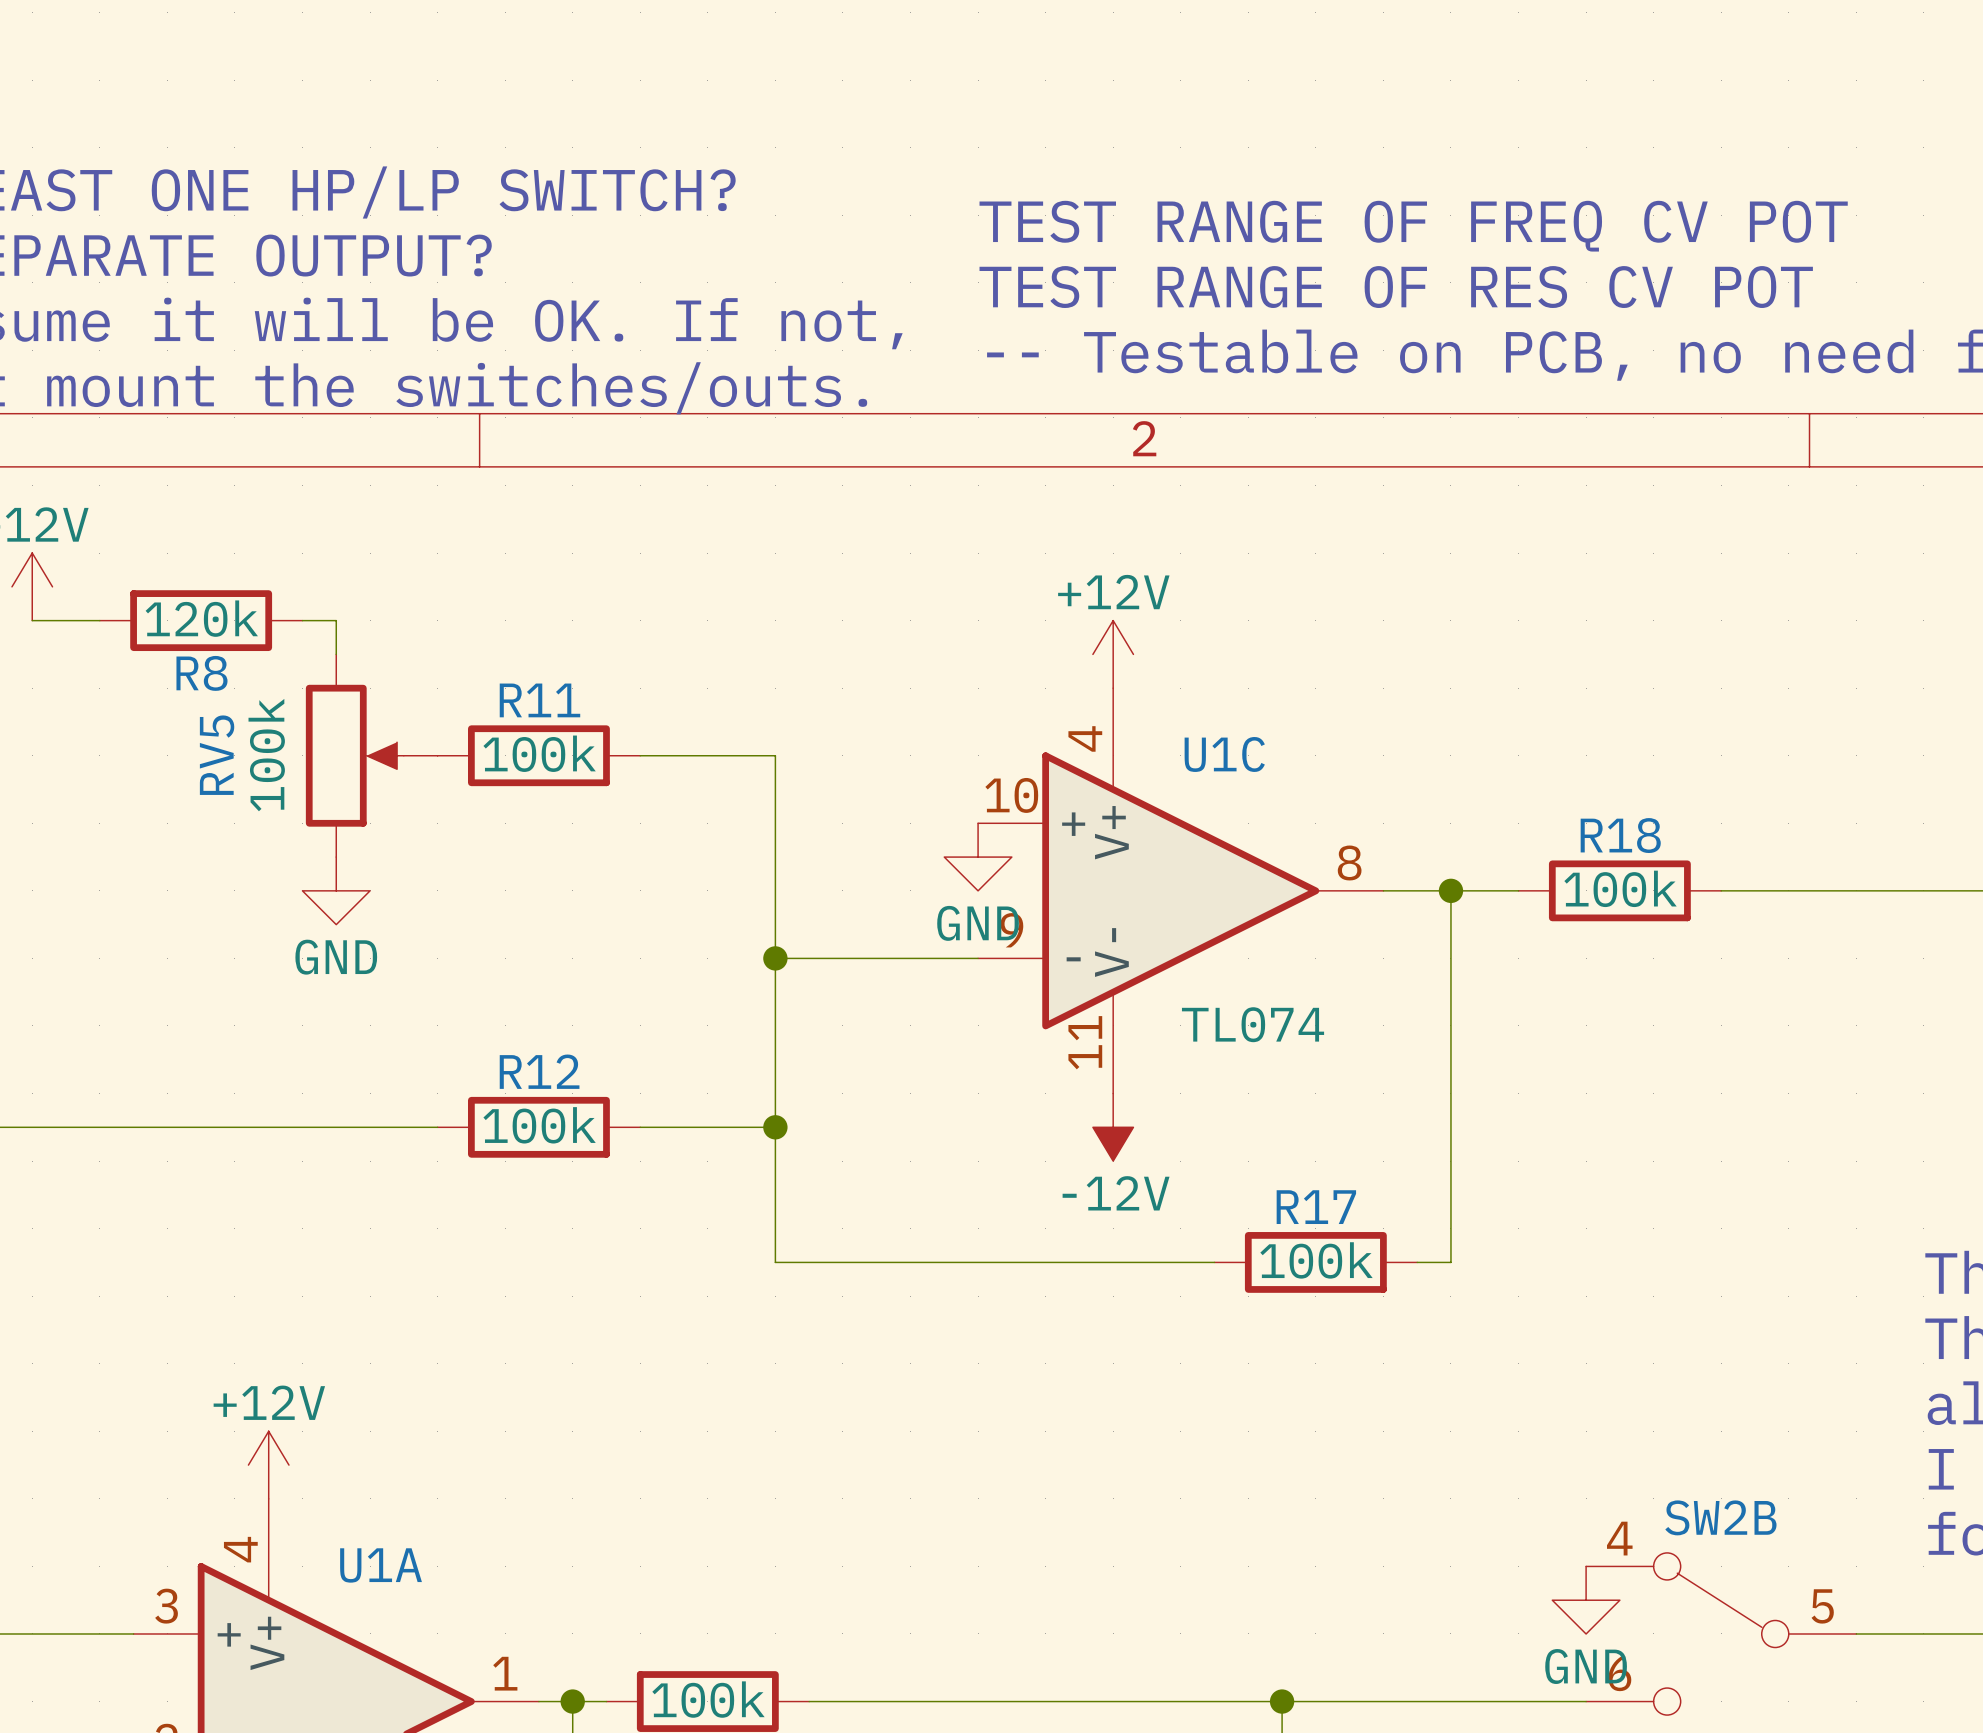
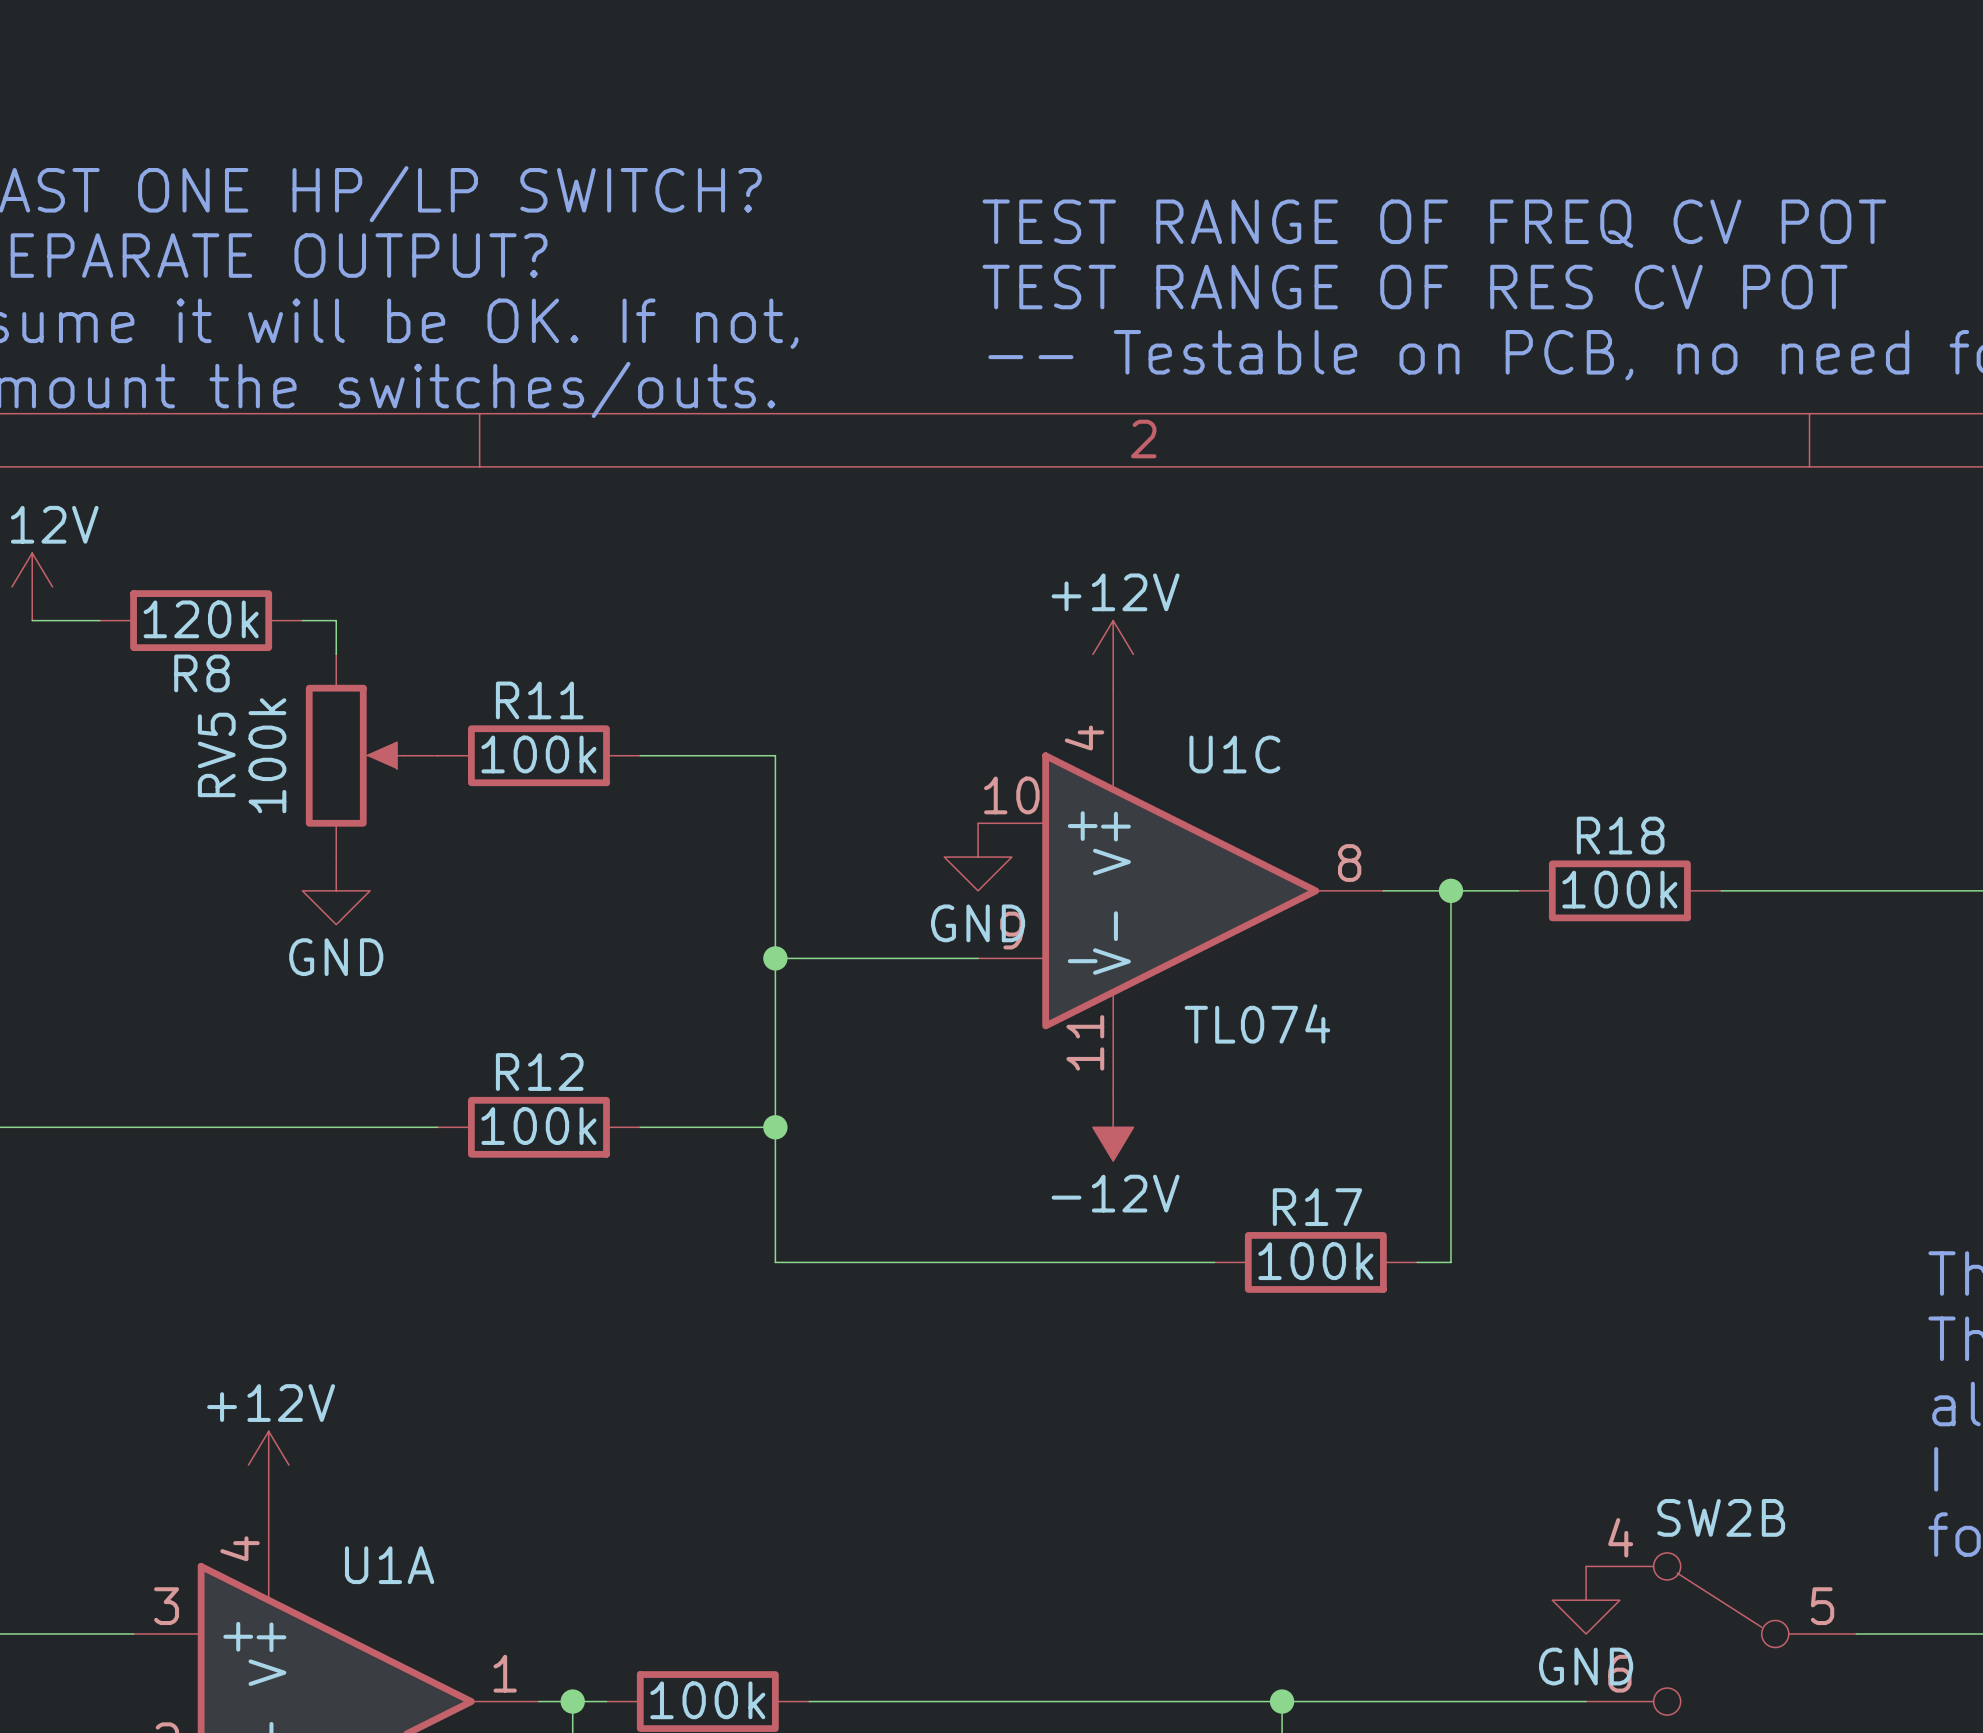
RV5 flip: as is (354, 755) -> up-down (354, 755)

